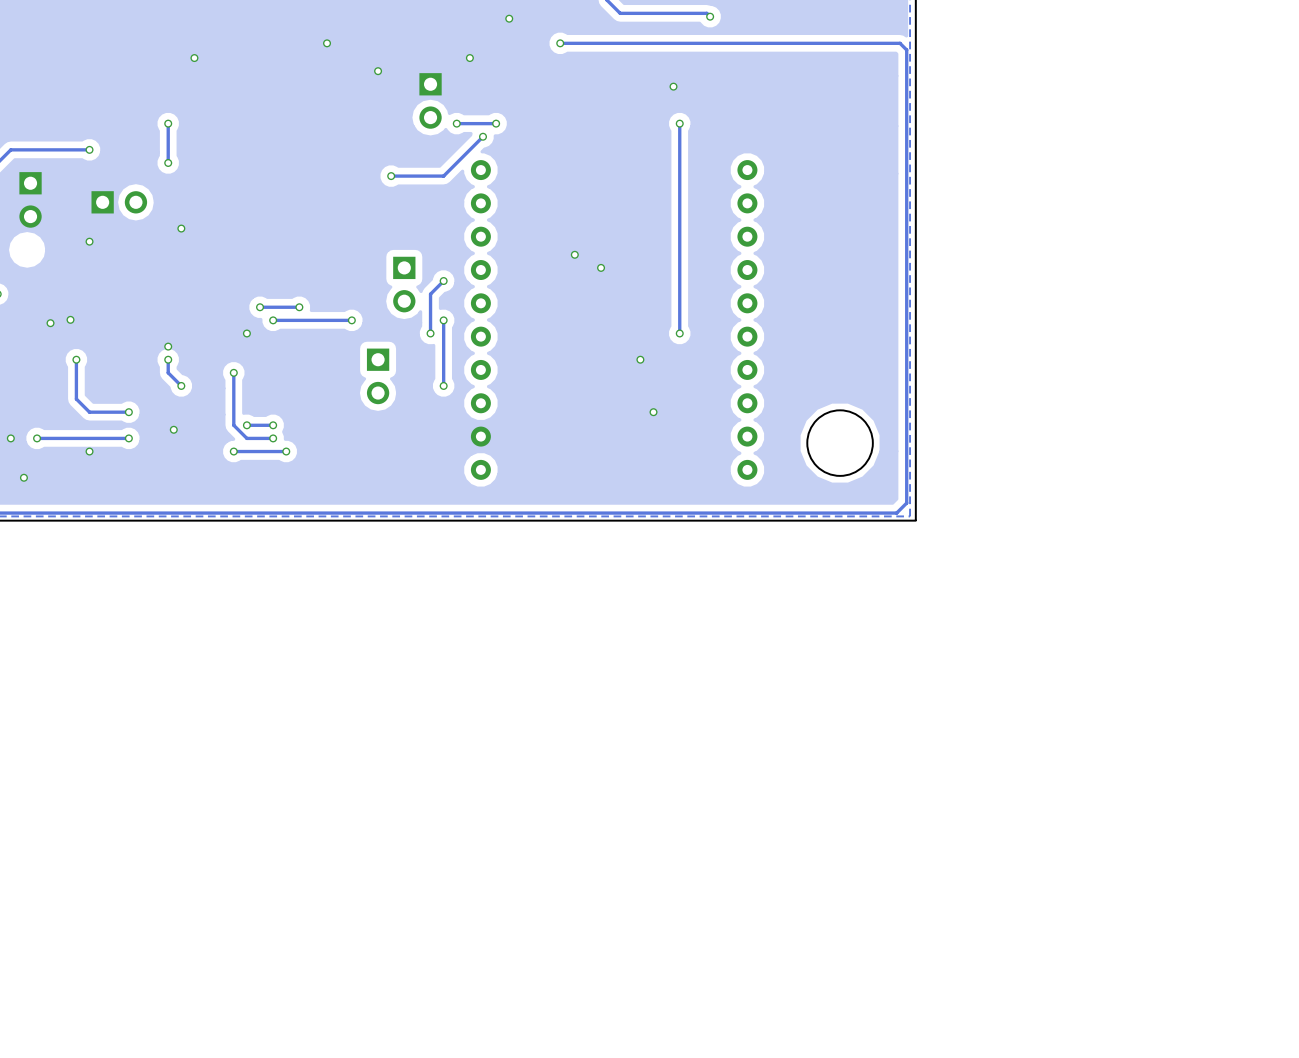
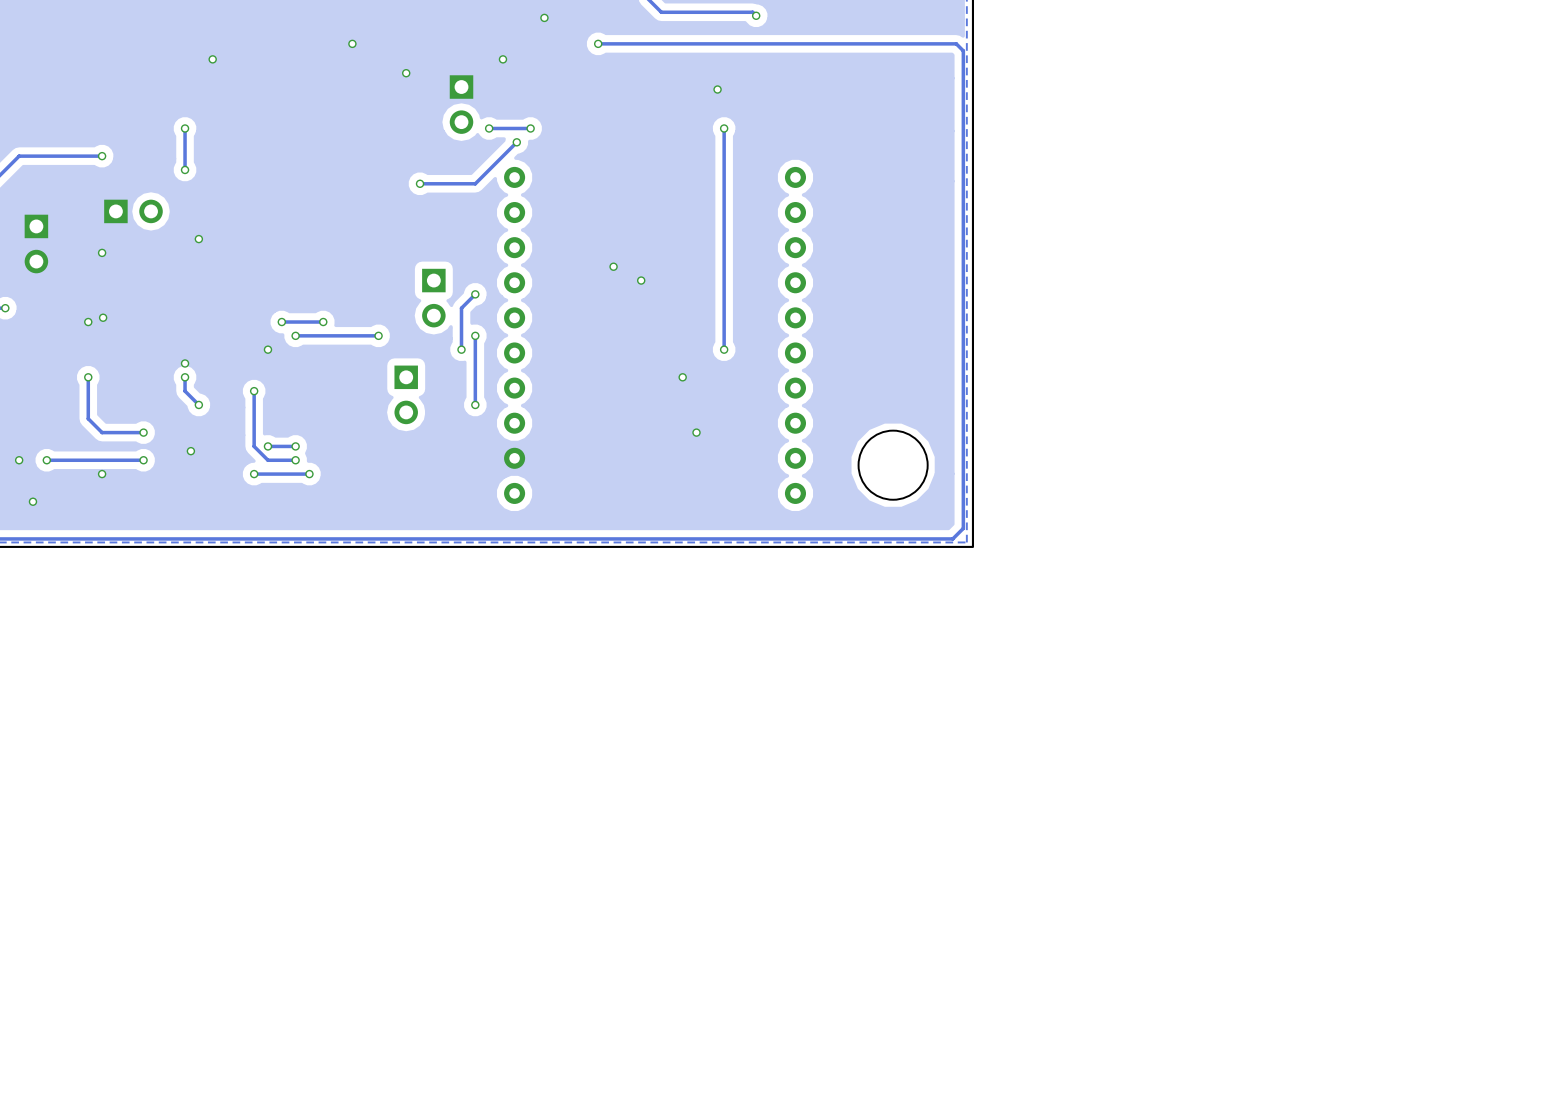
part position: (30, 199) -> (36, 244)
via: none -> (103, 317)
via: none -> (88, 322)
via: (70, 319) -> none
via: (50, 323) -> none

